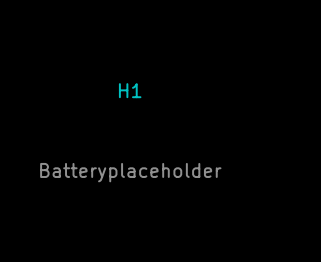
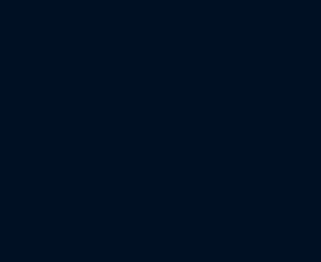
H1: Batteryplaceholder (130, 132) -> none

